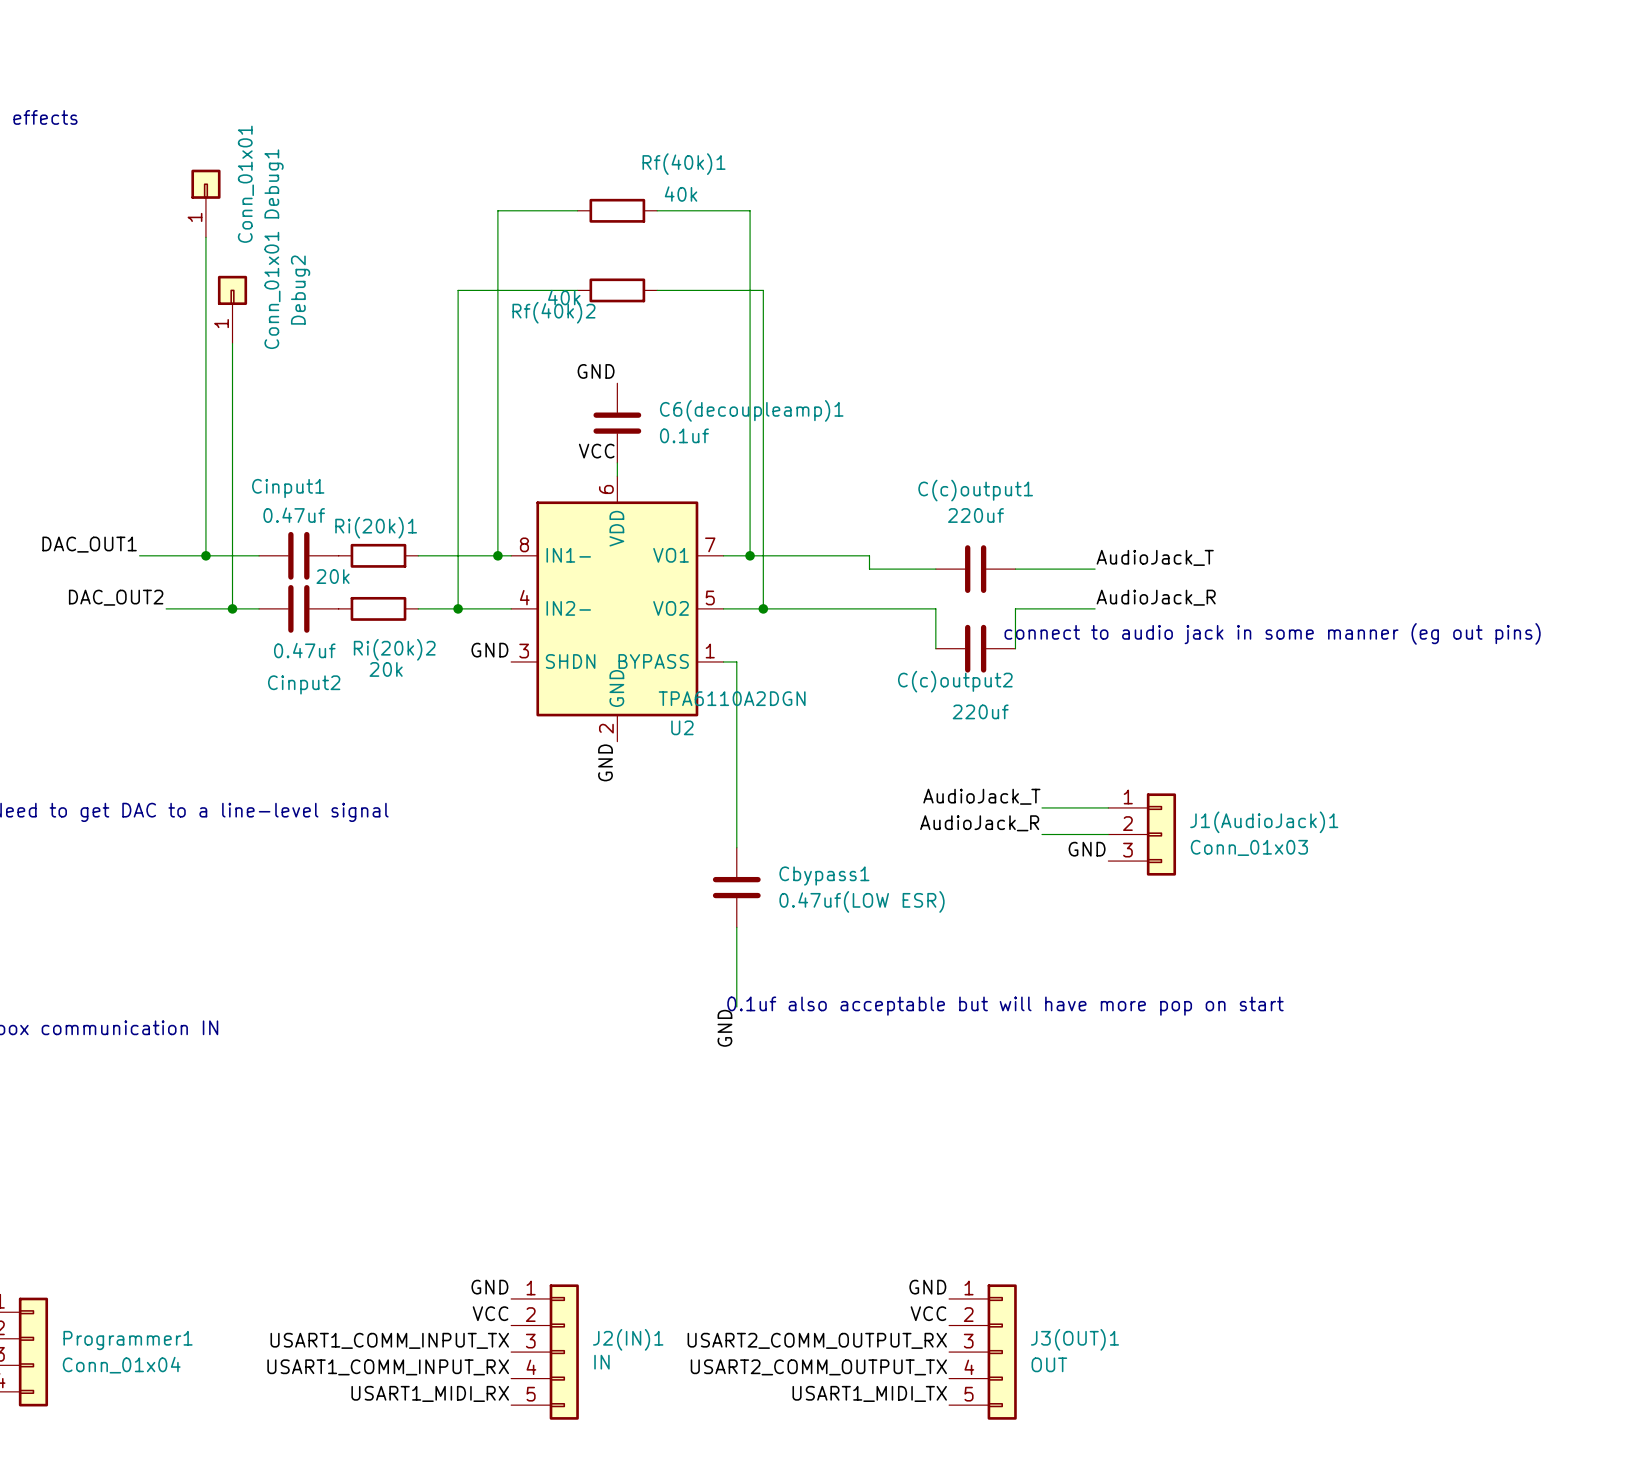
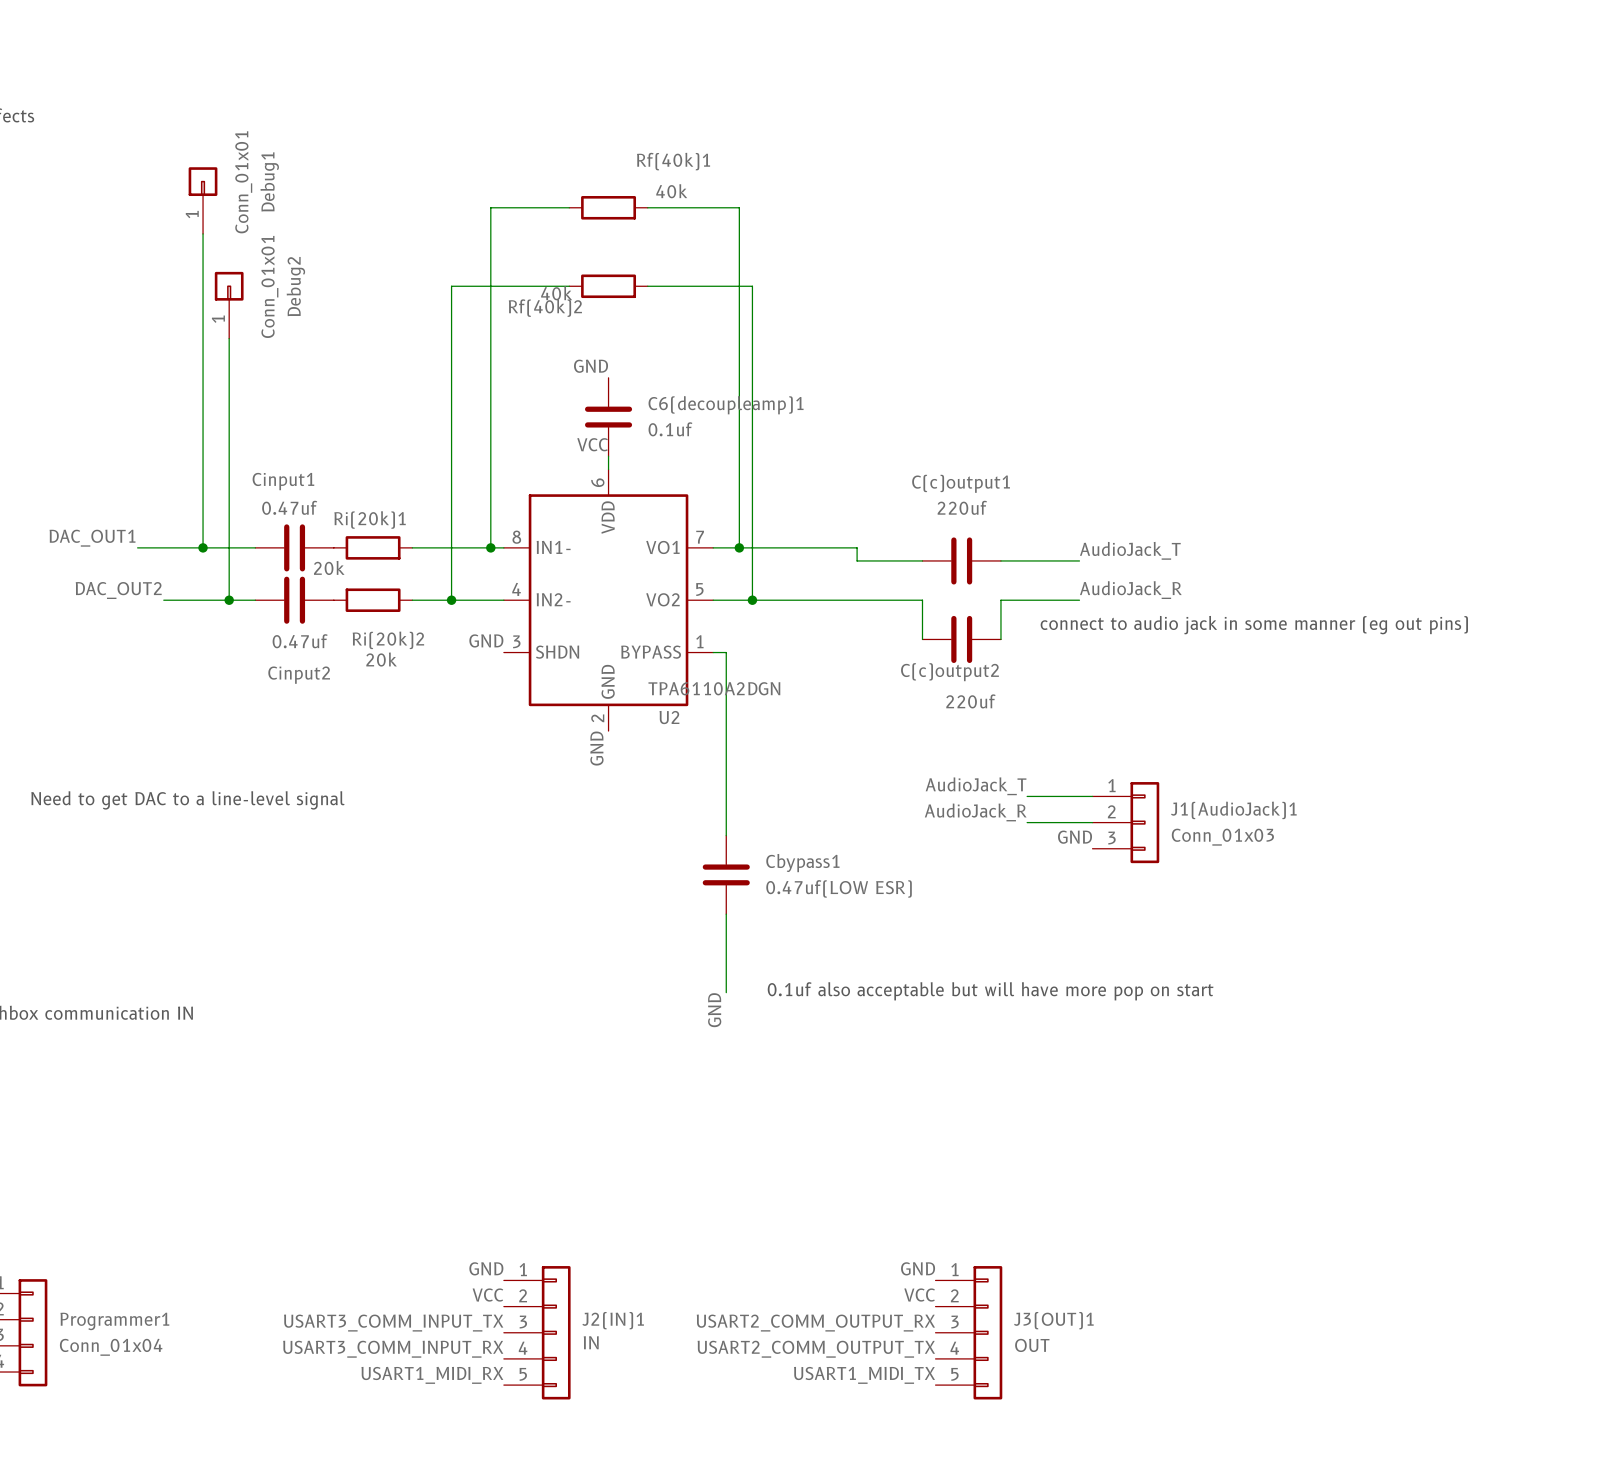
label: USART1_COMM_INPUT_TX (389, 1340) -> USART3_COMM_INPUT_TX (393, 1323)
label: USART1_COMM_INPUT_RX (388, 1367) -> USART3_COMM_INPUT_RX (393, 1349)

